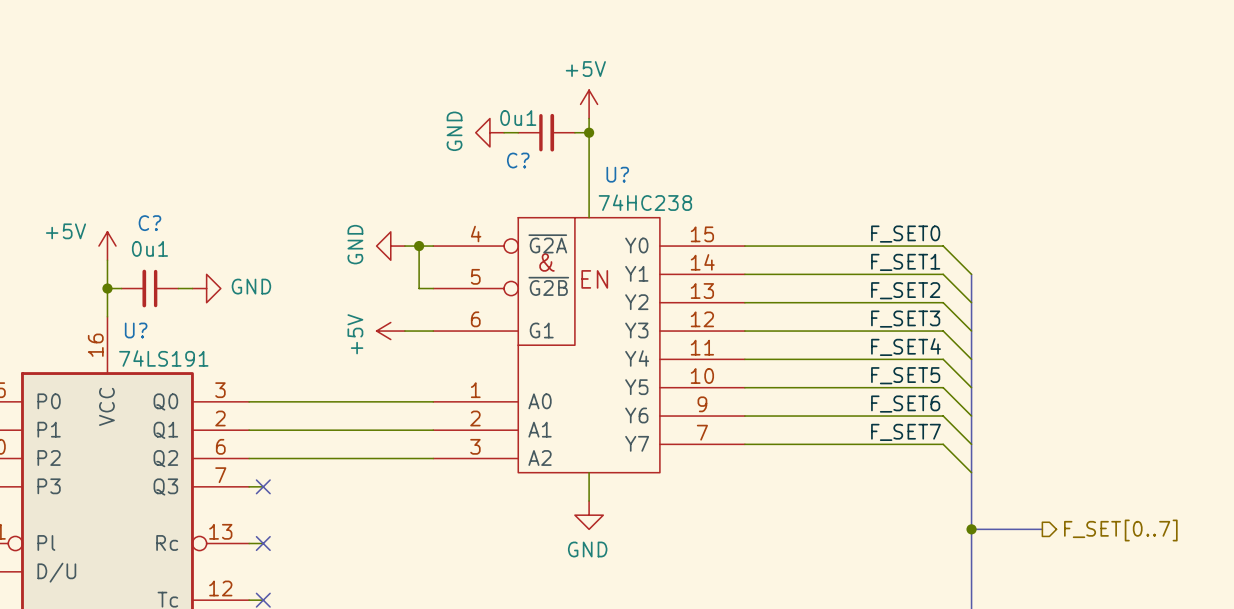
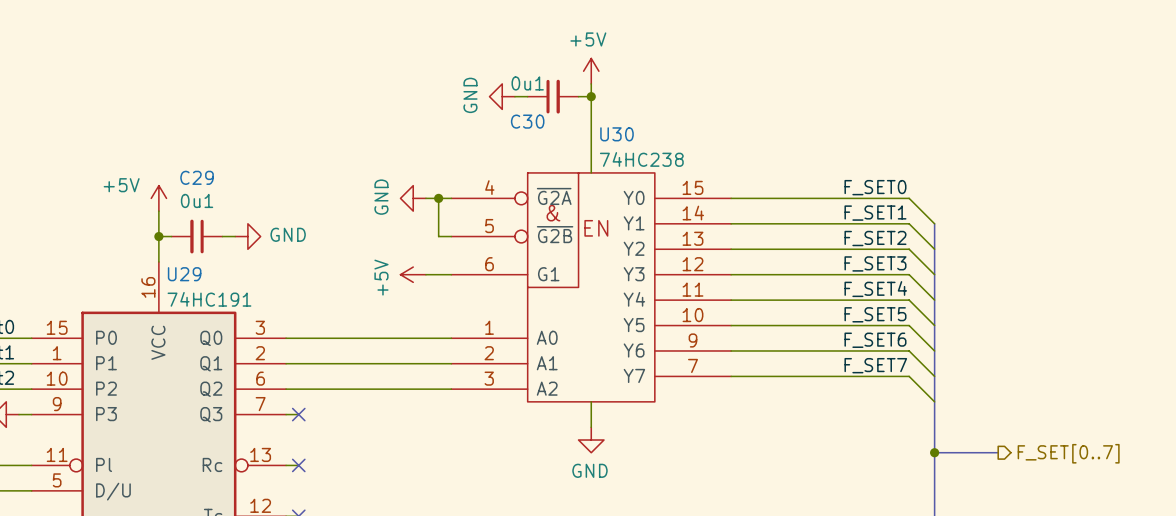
C? name: C? (518, 160) -> C30 (527, 121)
U? name: U? (617, 174) -> U30 (616, 134)
C? name: C? (149, 223) -> C29 (197, 177)
U? name: U? (136, 330) -> U29 (184, 274)
U? value: 74LS191 (163, 358) -> 74HC191 (209, 299)

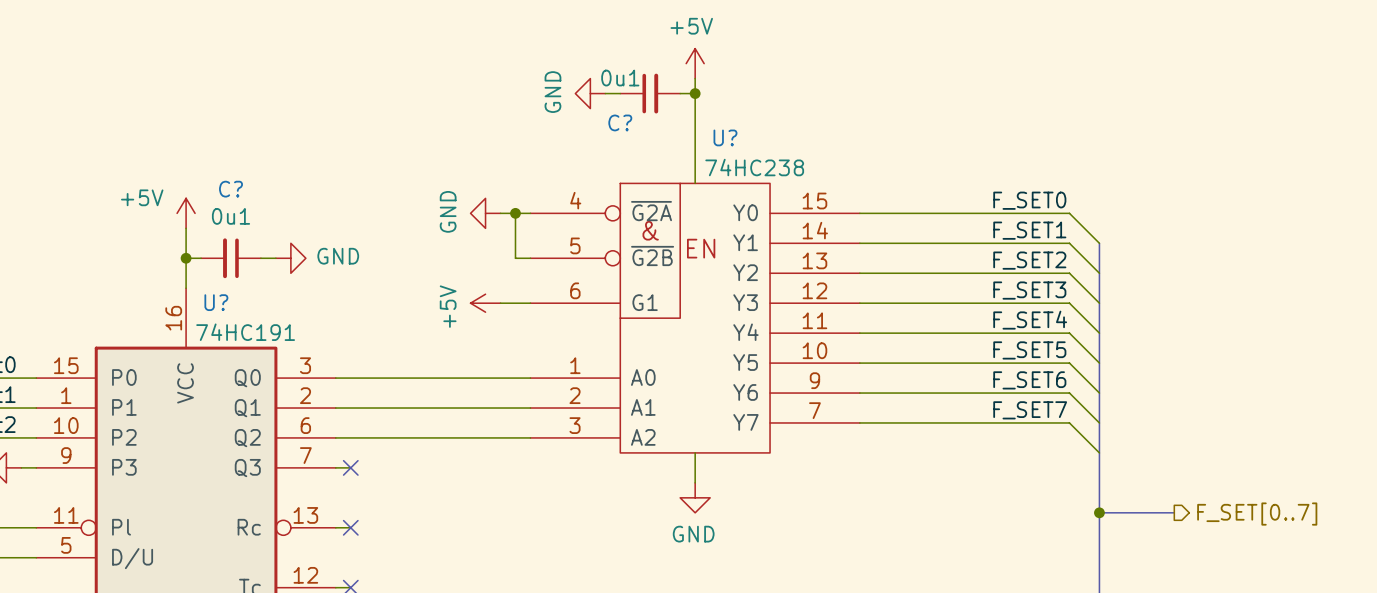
C30 name: C30 (527, 121) -> C? (620, 122)
U30 name: U30 (616, 134) -> U? (725, 137)
C29 name: C29 (197, 177) -> C? (231, 189)
U29 name: U29 (184, 274) -> U? (216, 302)

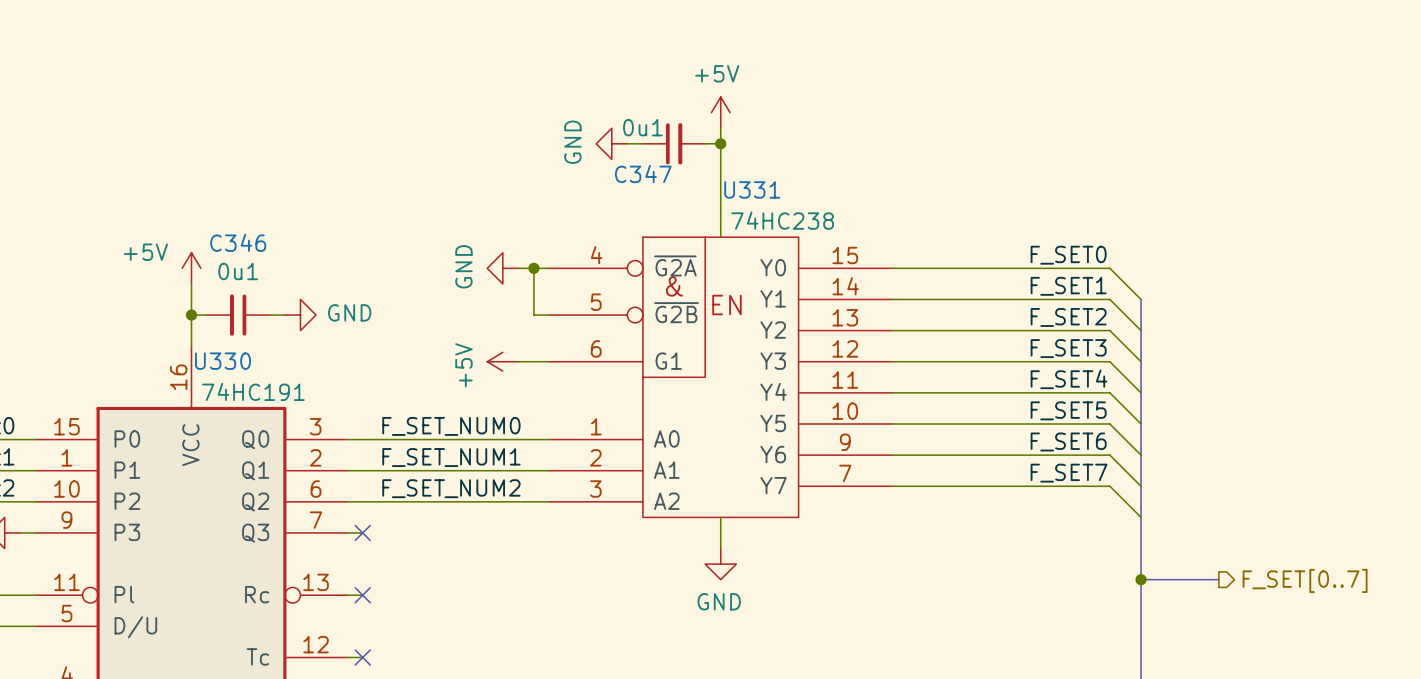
C? name: C? (620, 122) -> C347 (643, 173)
U? name: U? (725, 137) -> U331 (752, 189)
C? name: C? (231, 189) -> C346 (238, 242)
U? name: U? (216, 302) -> U330 (223, 361)
label: none -> F_SET_NUM0 (451, 426)
label: none -> F_SET_NUM1 (451, 457)
label: none -> F_SET_NUM2 (451, 488)

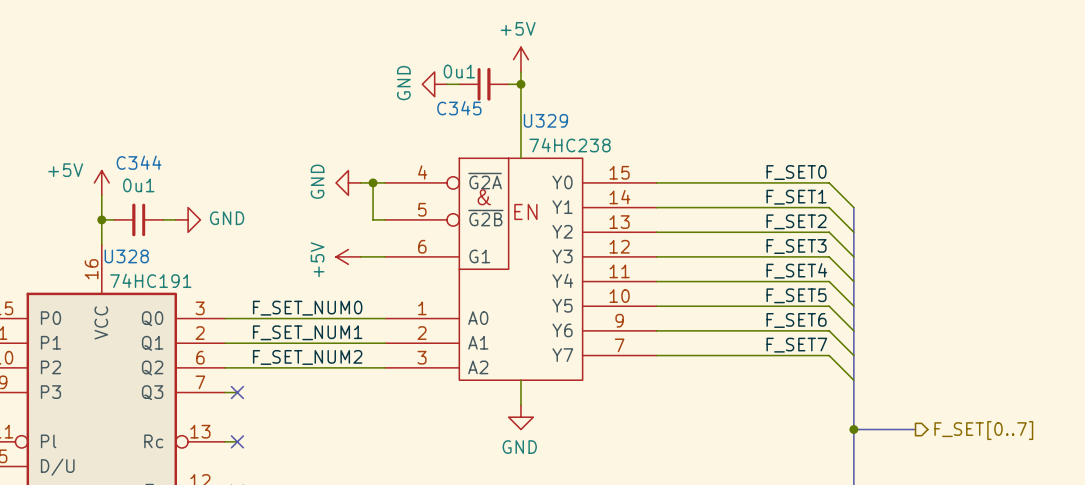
C347 name: C347 (643, 173) -> C345 (459, 108)
U331 name: U331 (752, 189) -> U329 (545, 120)
C346 name: C346 (238, 242) -> C344 (139, 162)
U330 name: U330 (223, 361) -> U328 (126, 256)

